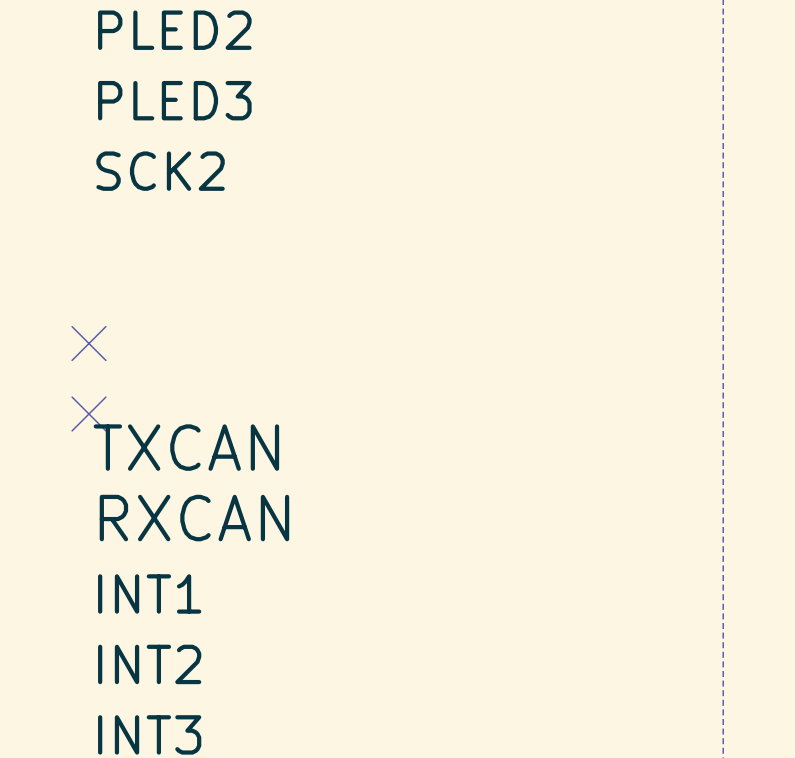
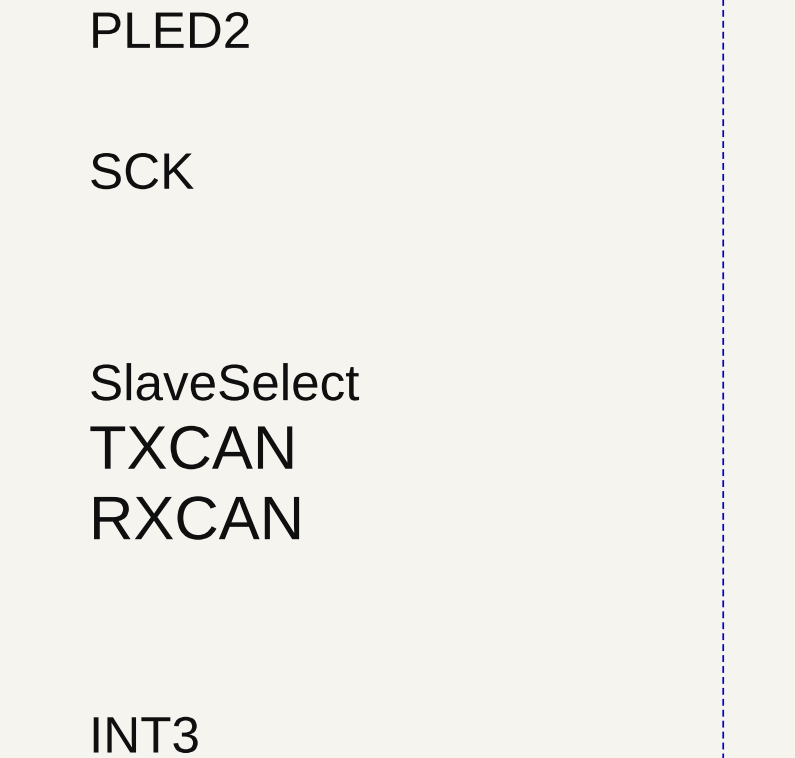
label: PLED3 (174, 100) -> none
label: SCK2 (160, 171) -> SCK (142, 171)
no-connect mark: (88, 343) -> none
label: none -> SlaveSelect (225, 381)
no-connect mark: (88, 414) -> none
label: INT1 (149, 593) -> none
label: INT2 (149, 664) -> none

